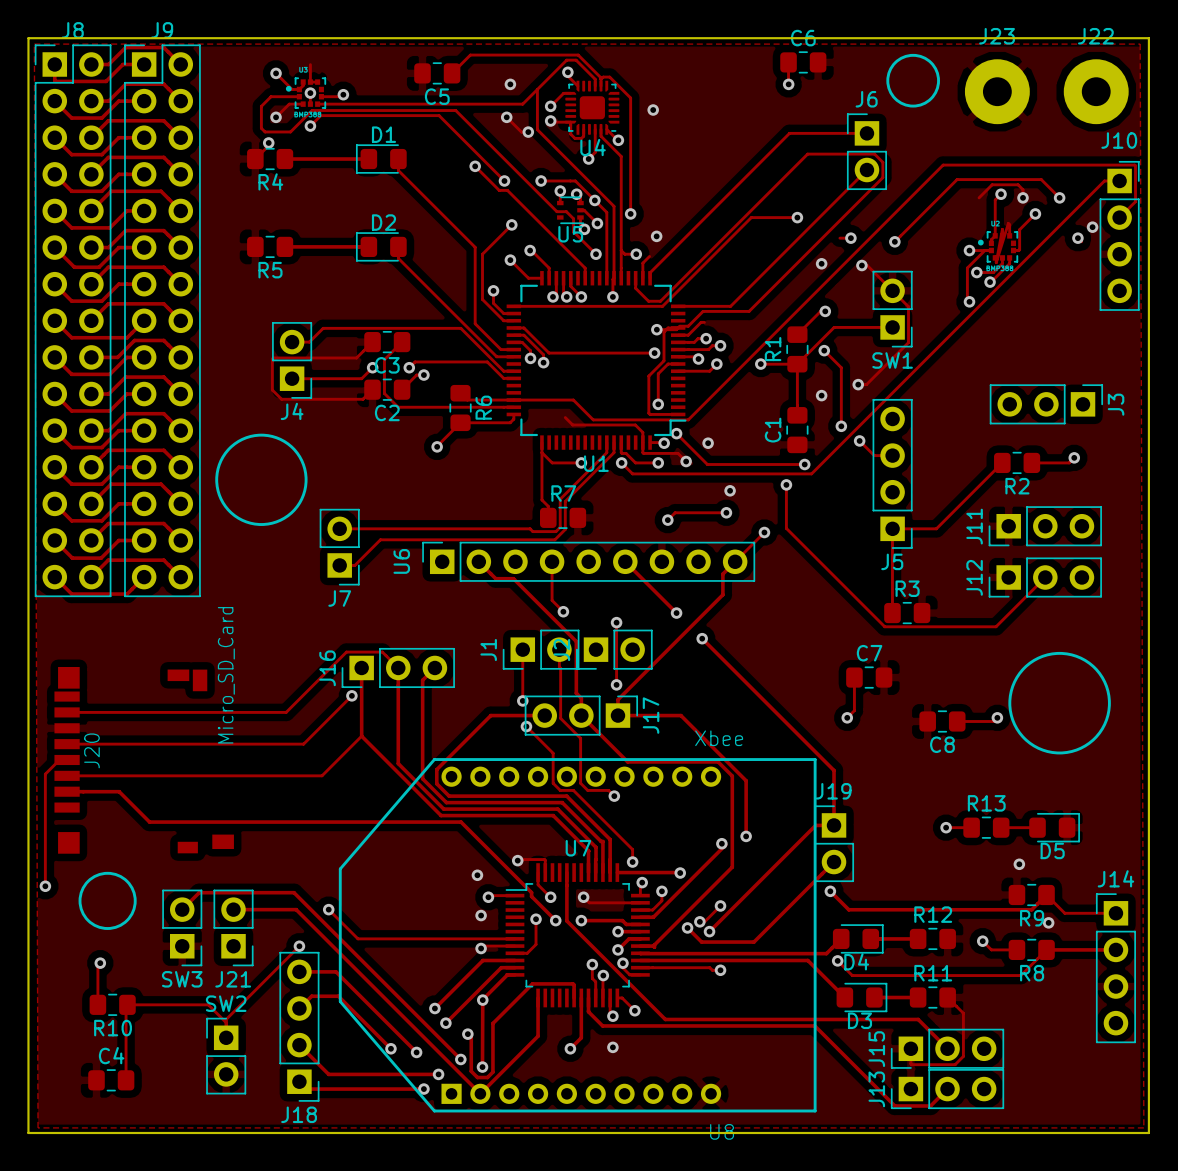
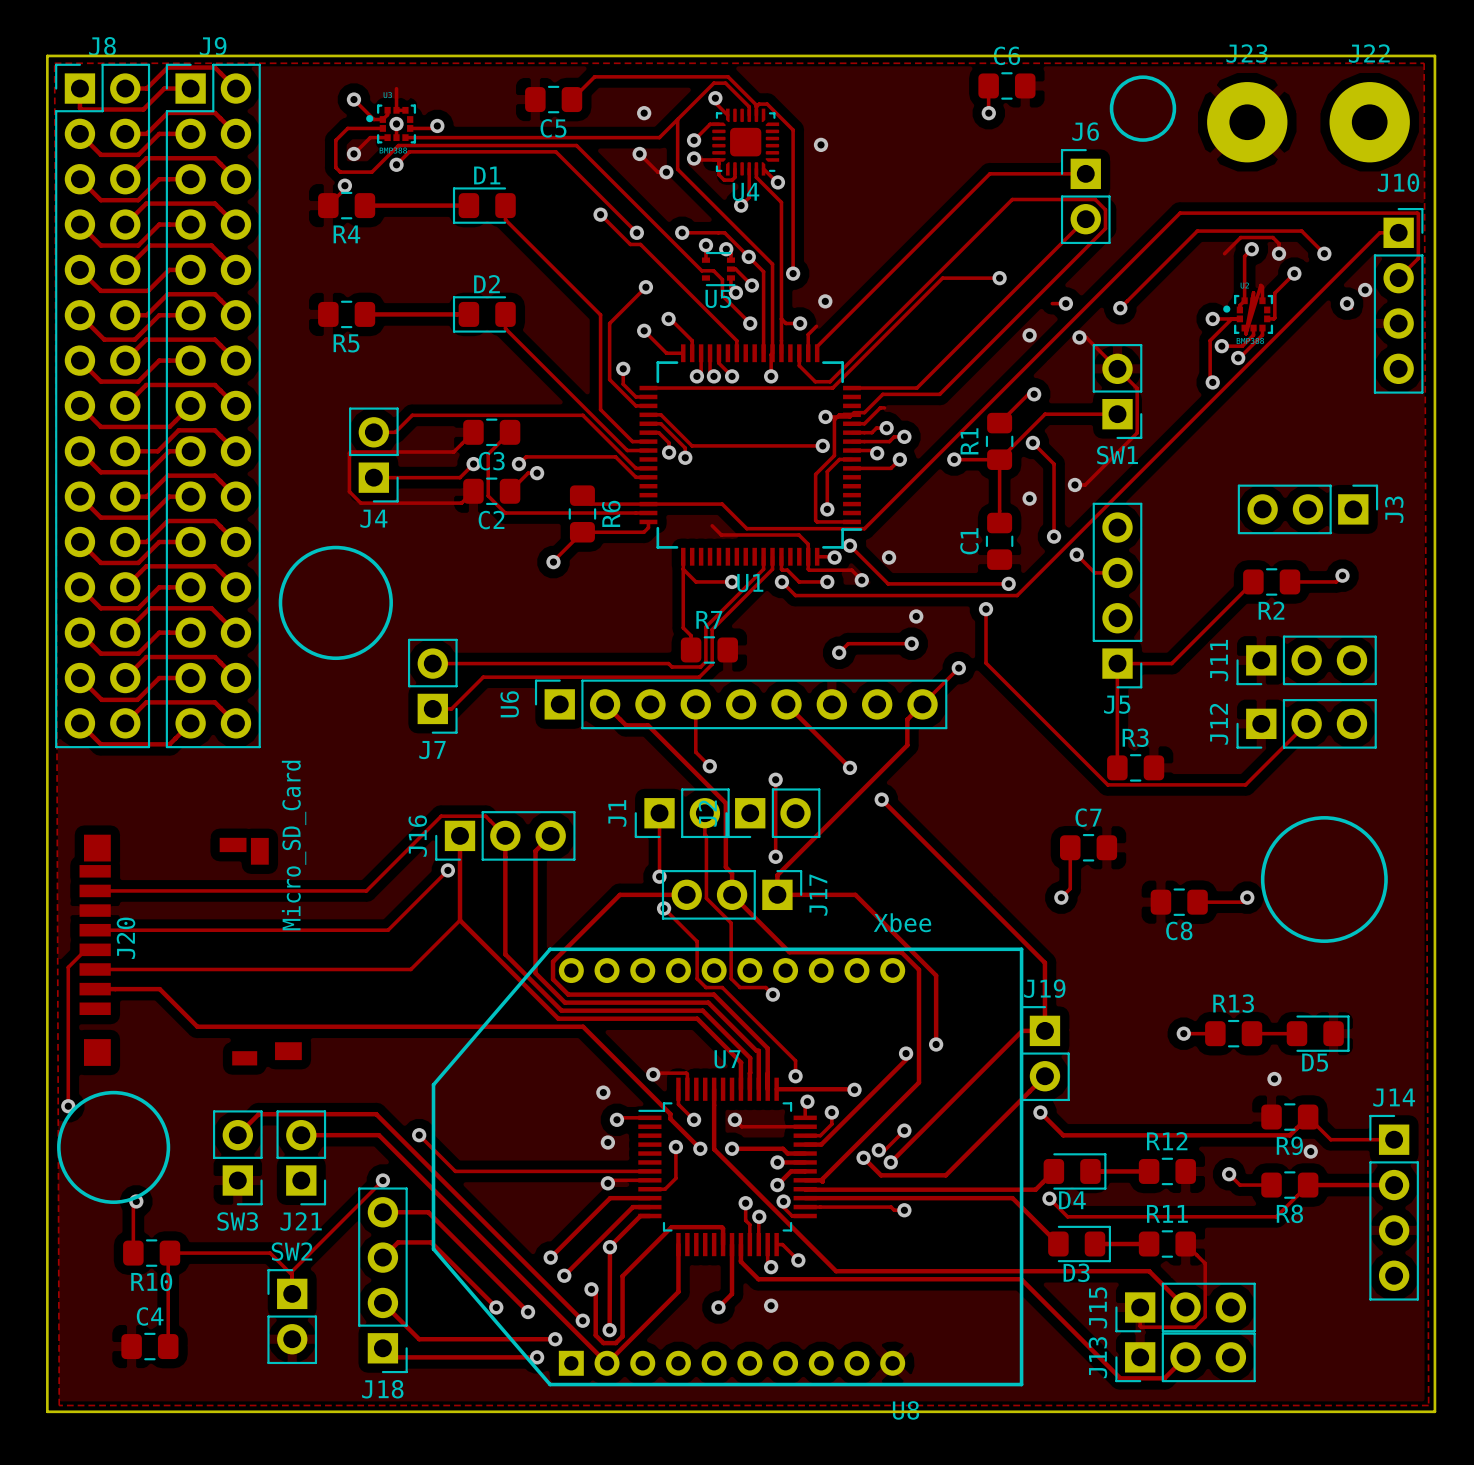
drawing: [78, 871, 137, 930] -> none
drawing: none -> [57, 1090, 171, 1204]

